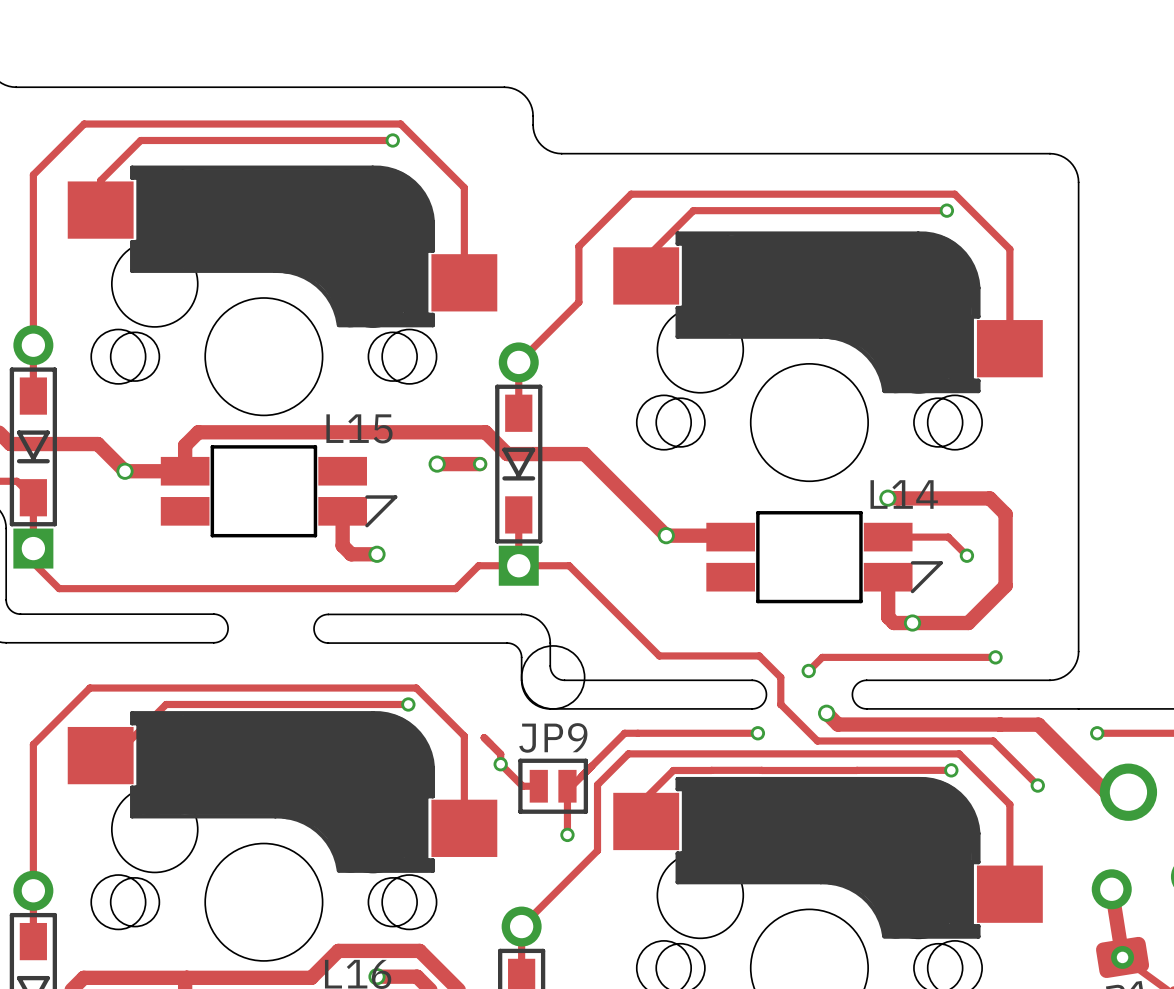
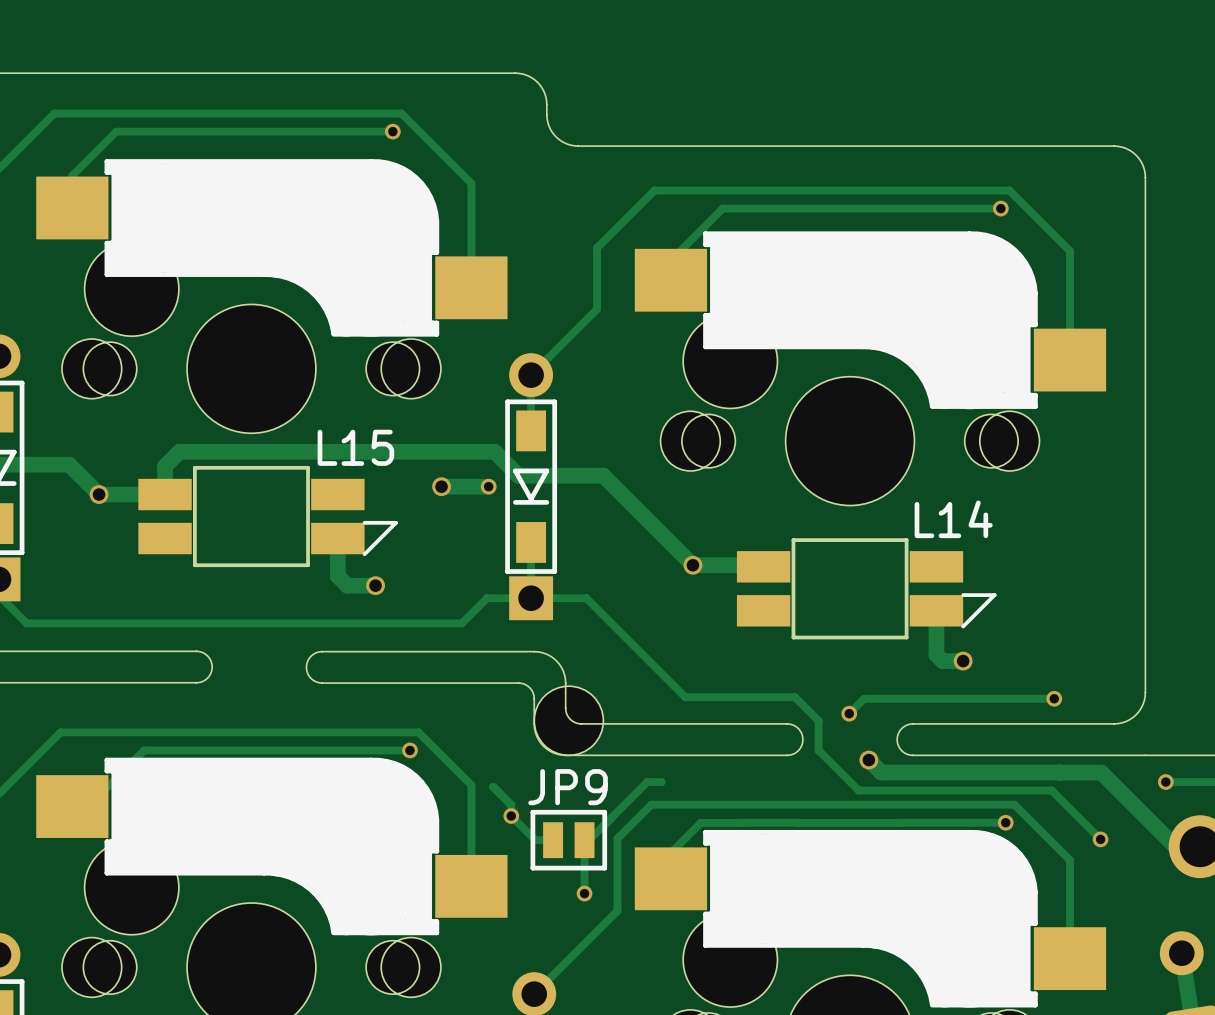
via: (887, 498) -> none
track: (898, 498) (989, 498) (1005, 514) (1005, 585) (968, 623) (912, 623) -> none
track: (888, 537) (948, 537) (966, 555) -> none
via: (966, 555) -> none
track: (637, 733) (757, 733) -> none
via: (757, 733) -> none

